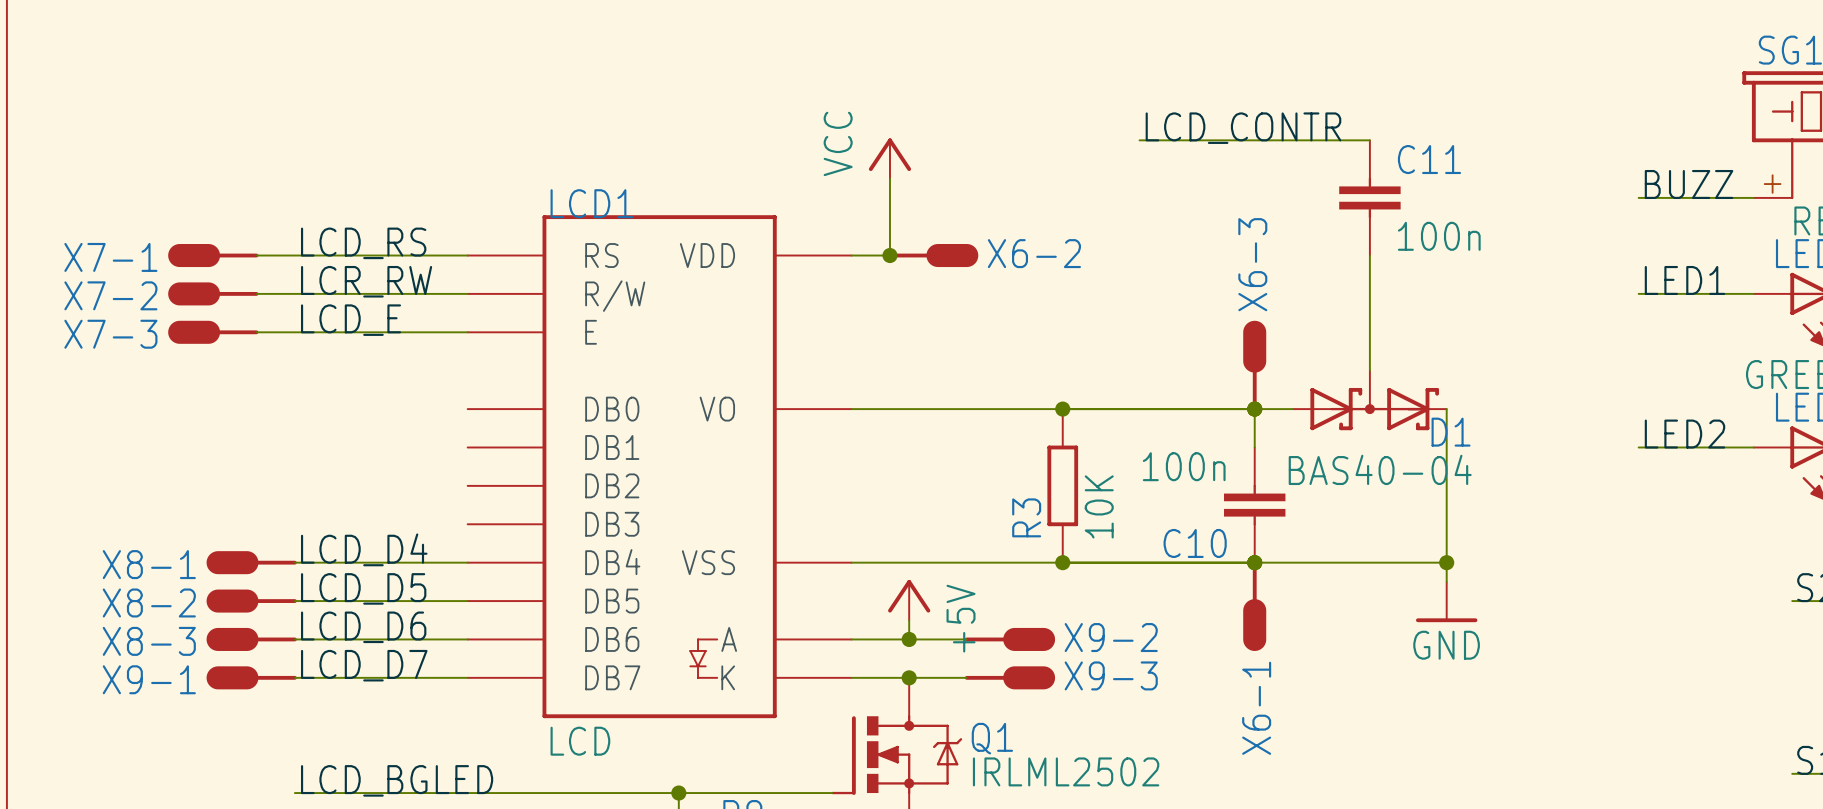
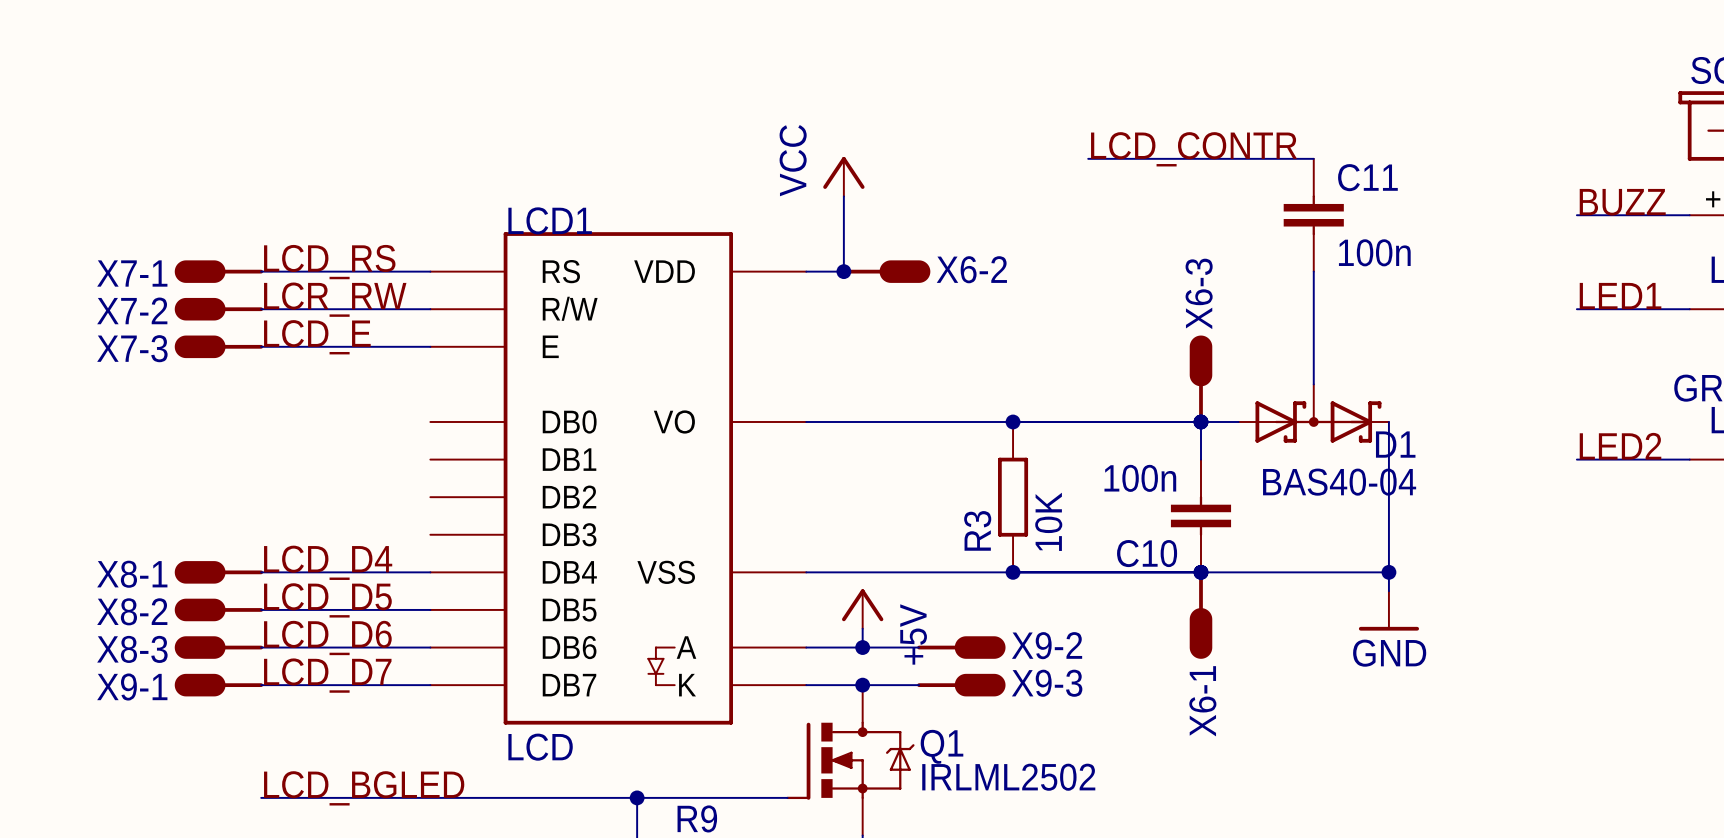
X7-1 position: (213, 255) -> (218, 271)
X7-2 position: (213, 293) -> (218, 309)
X7-3 position: (213, 332) -> (218, 346)

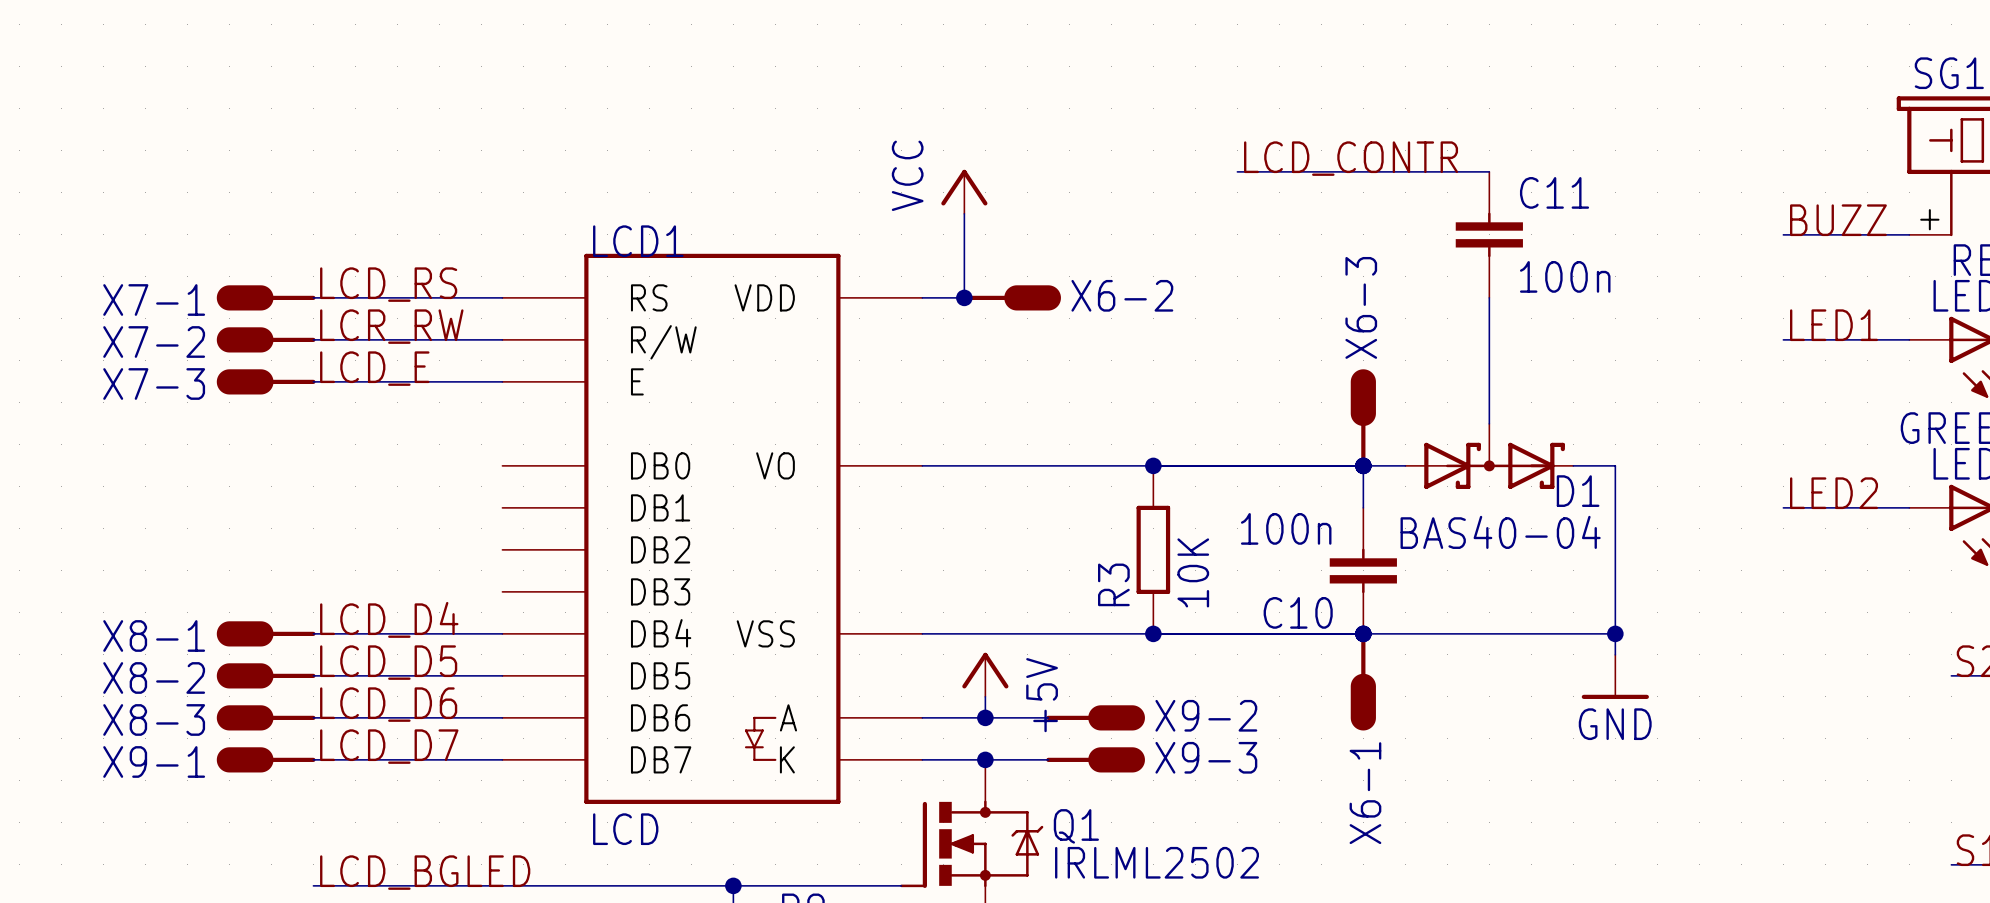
wire: (1388, 421) (1388, 591) -> (1573, 465) (1615, 465) (1615, 654)
wire: none -> (1573, 633) (1615, 633)
junction position: (1388, 572) -> (1615, 633)
power symbol position: GND (1388, 610) -> GND (1615, 676)

